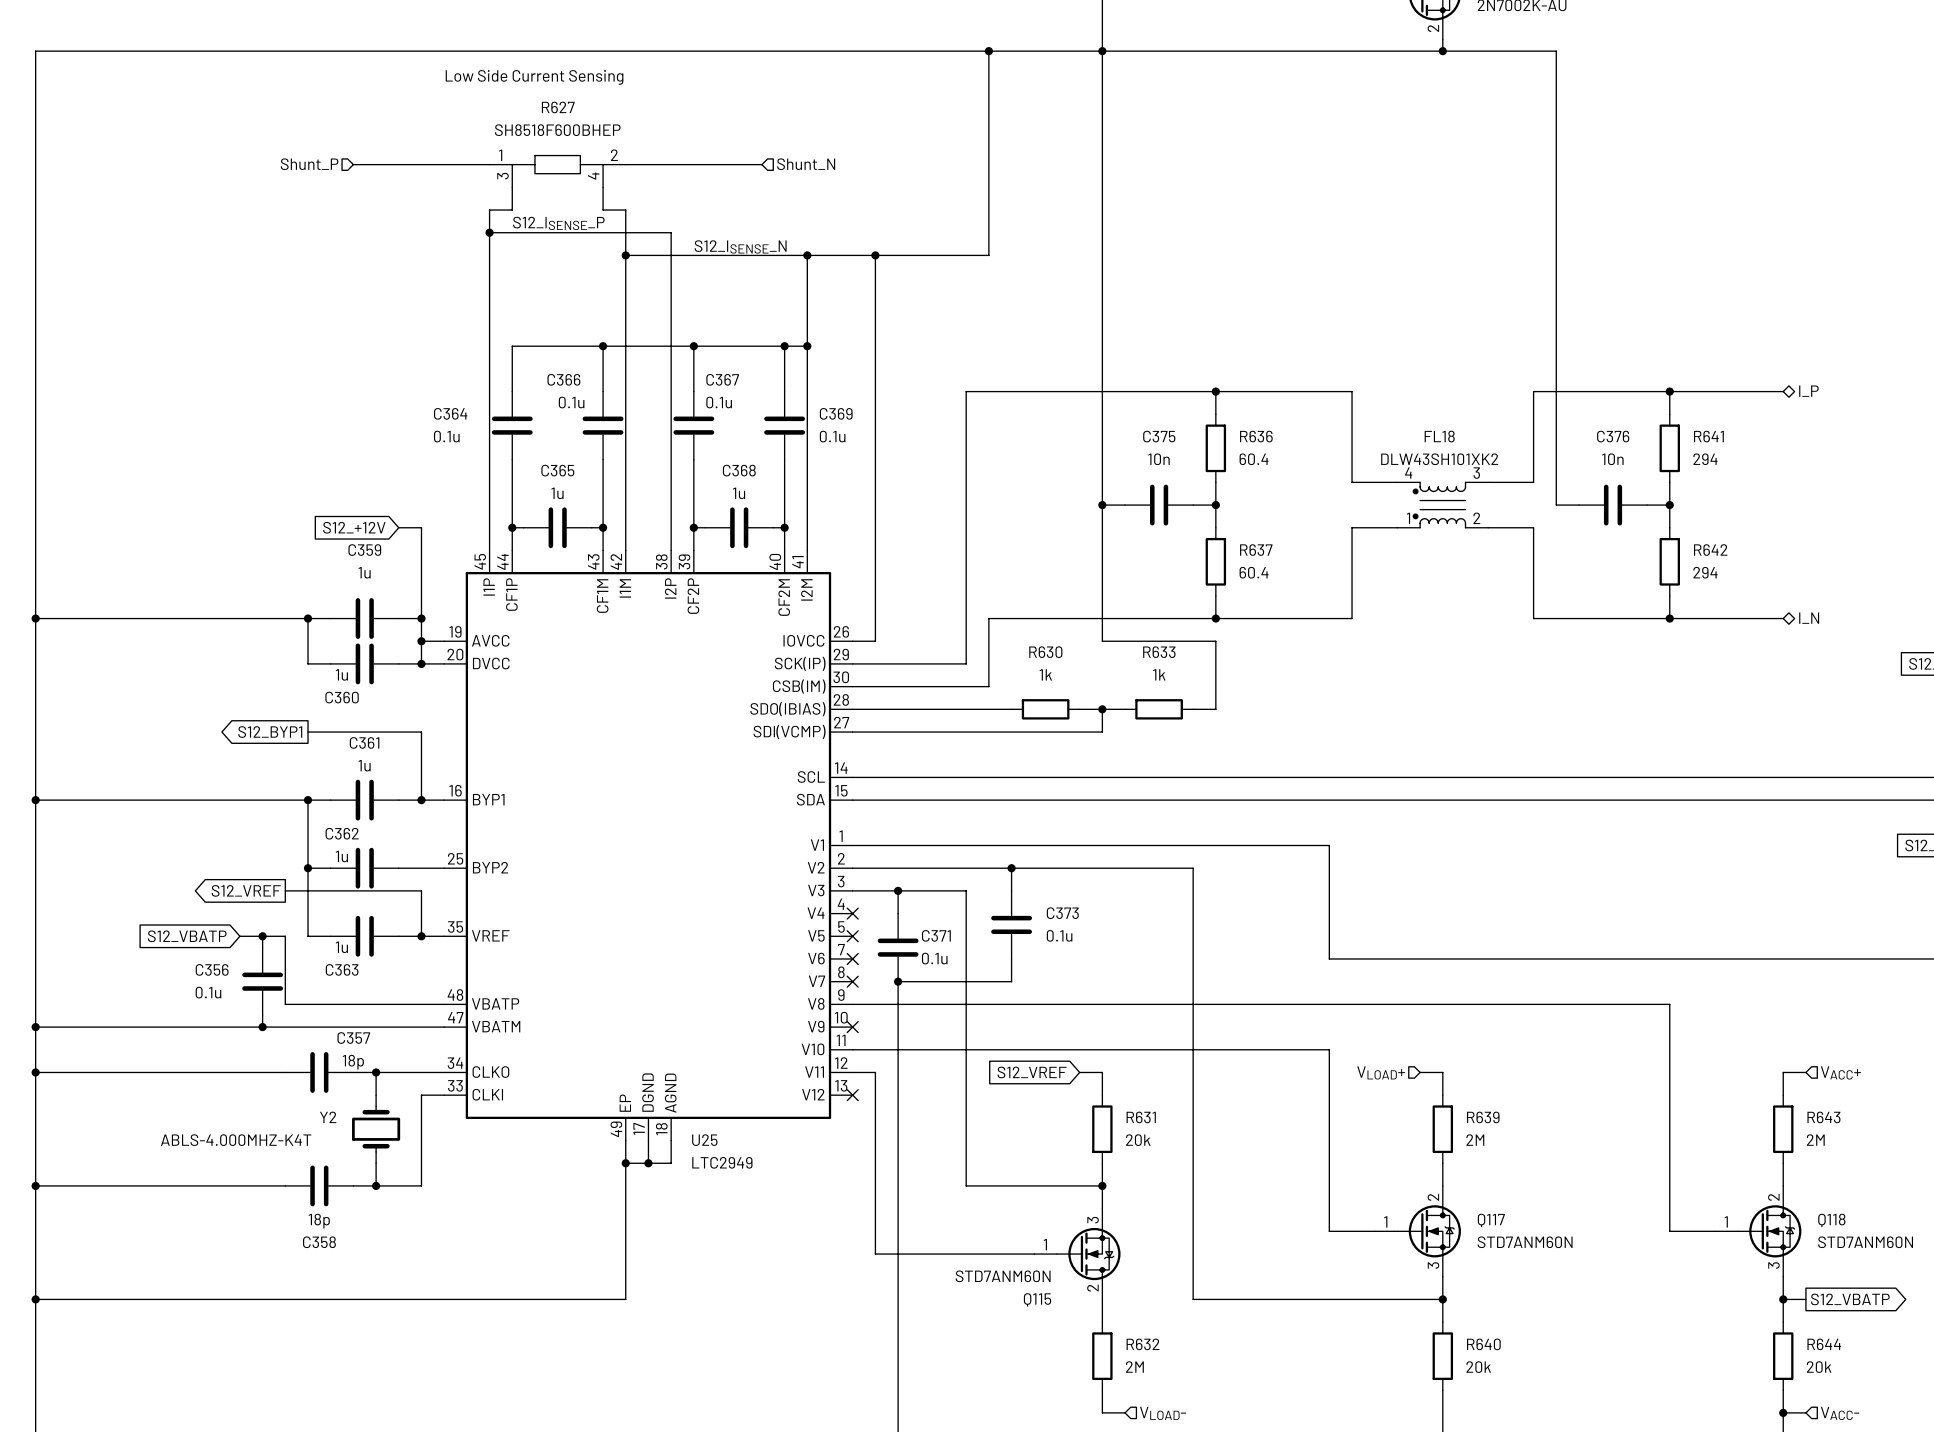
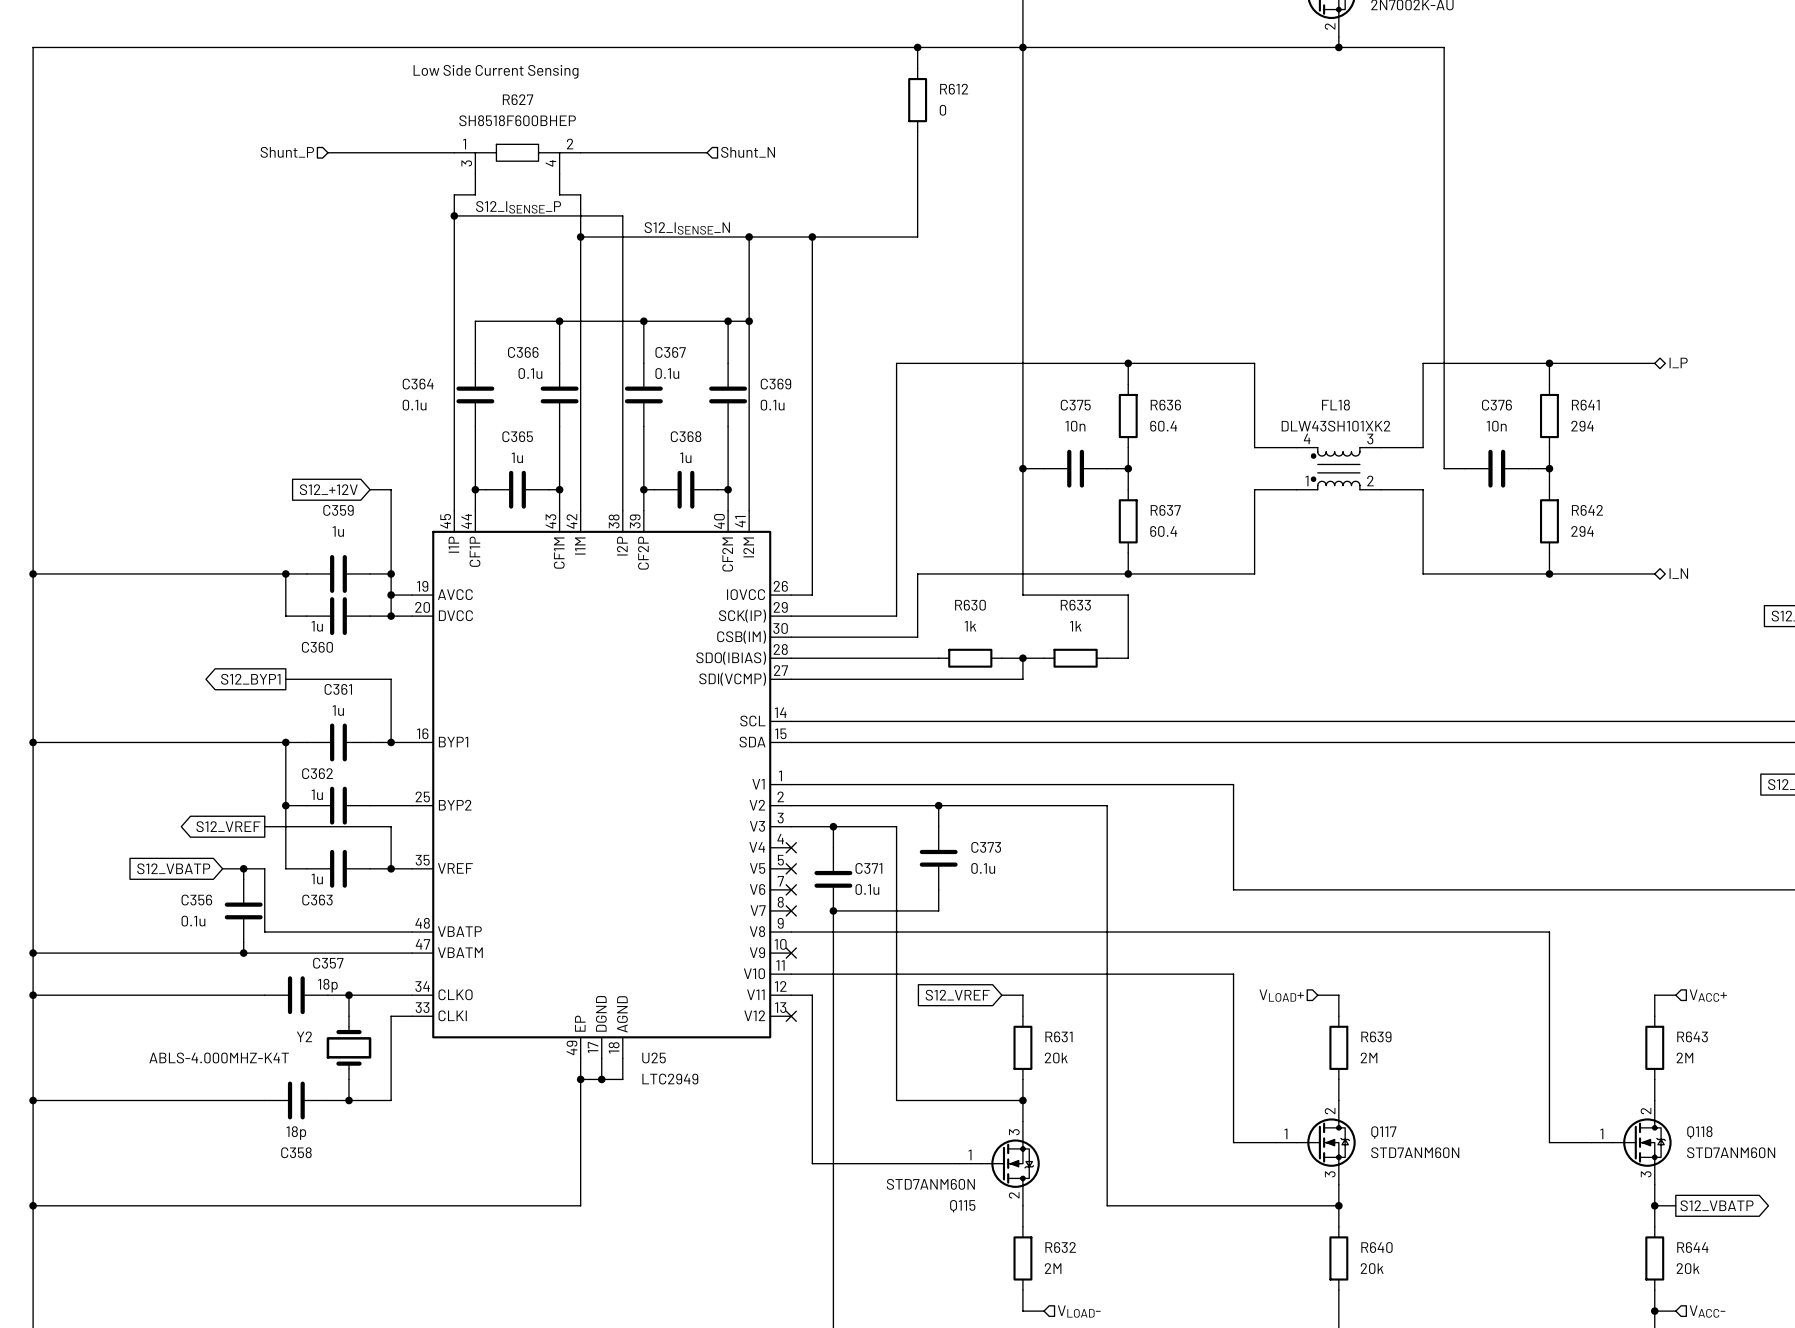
wire: (988, 73) (988, 141) -> none
R612: none -> 0 (917, 100)
text: S12_ISENSE_N (740, 246) -> none
label: none -> S12_ISENSE_N (687, 228)

